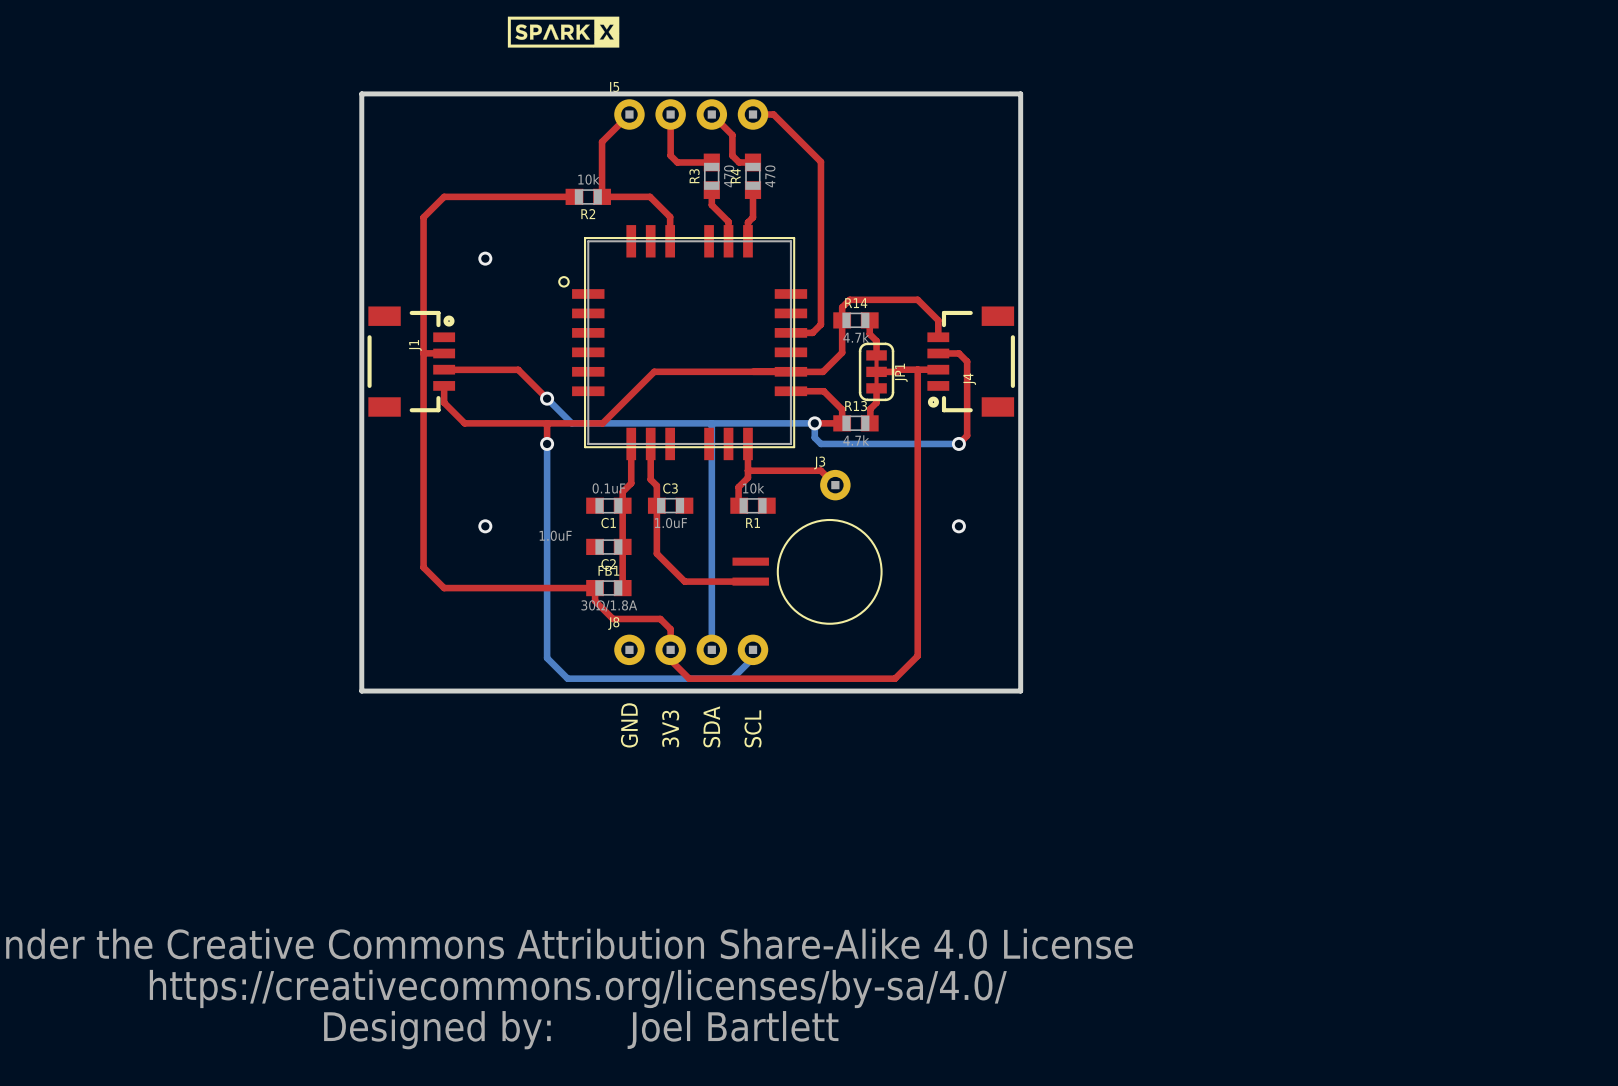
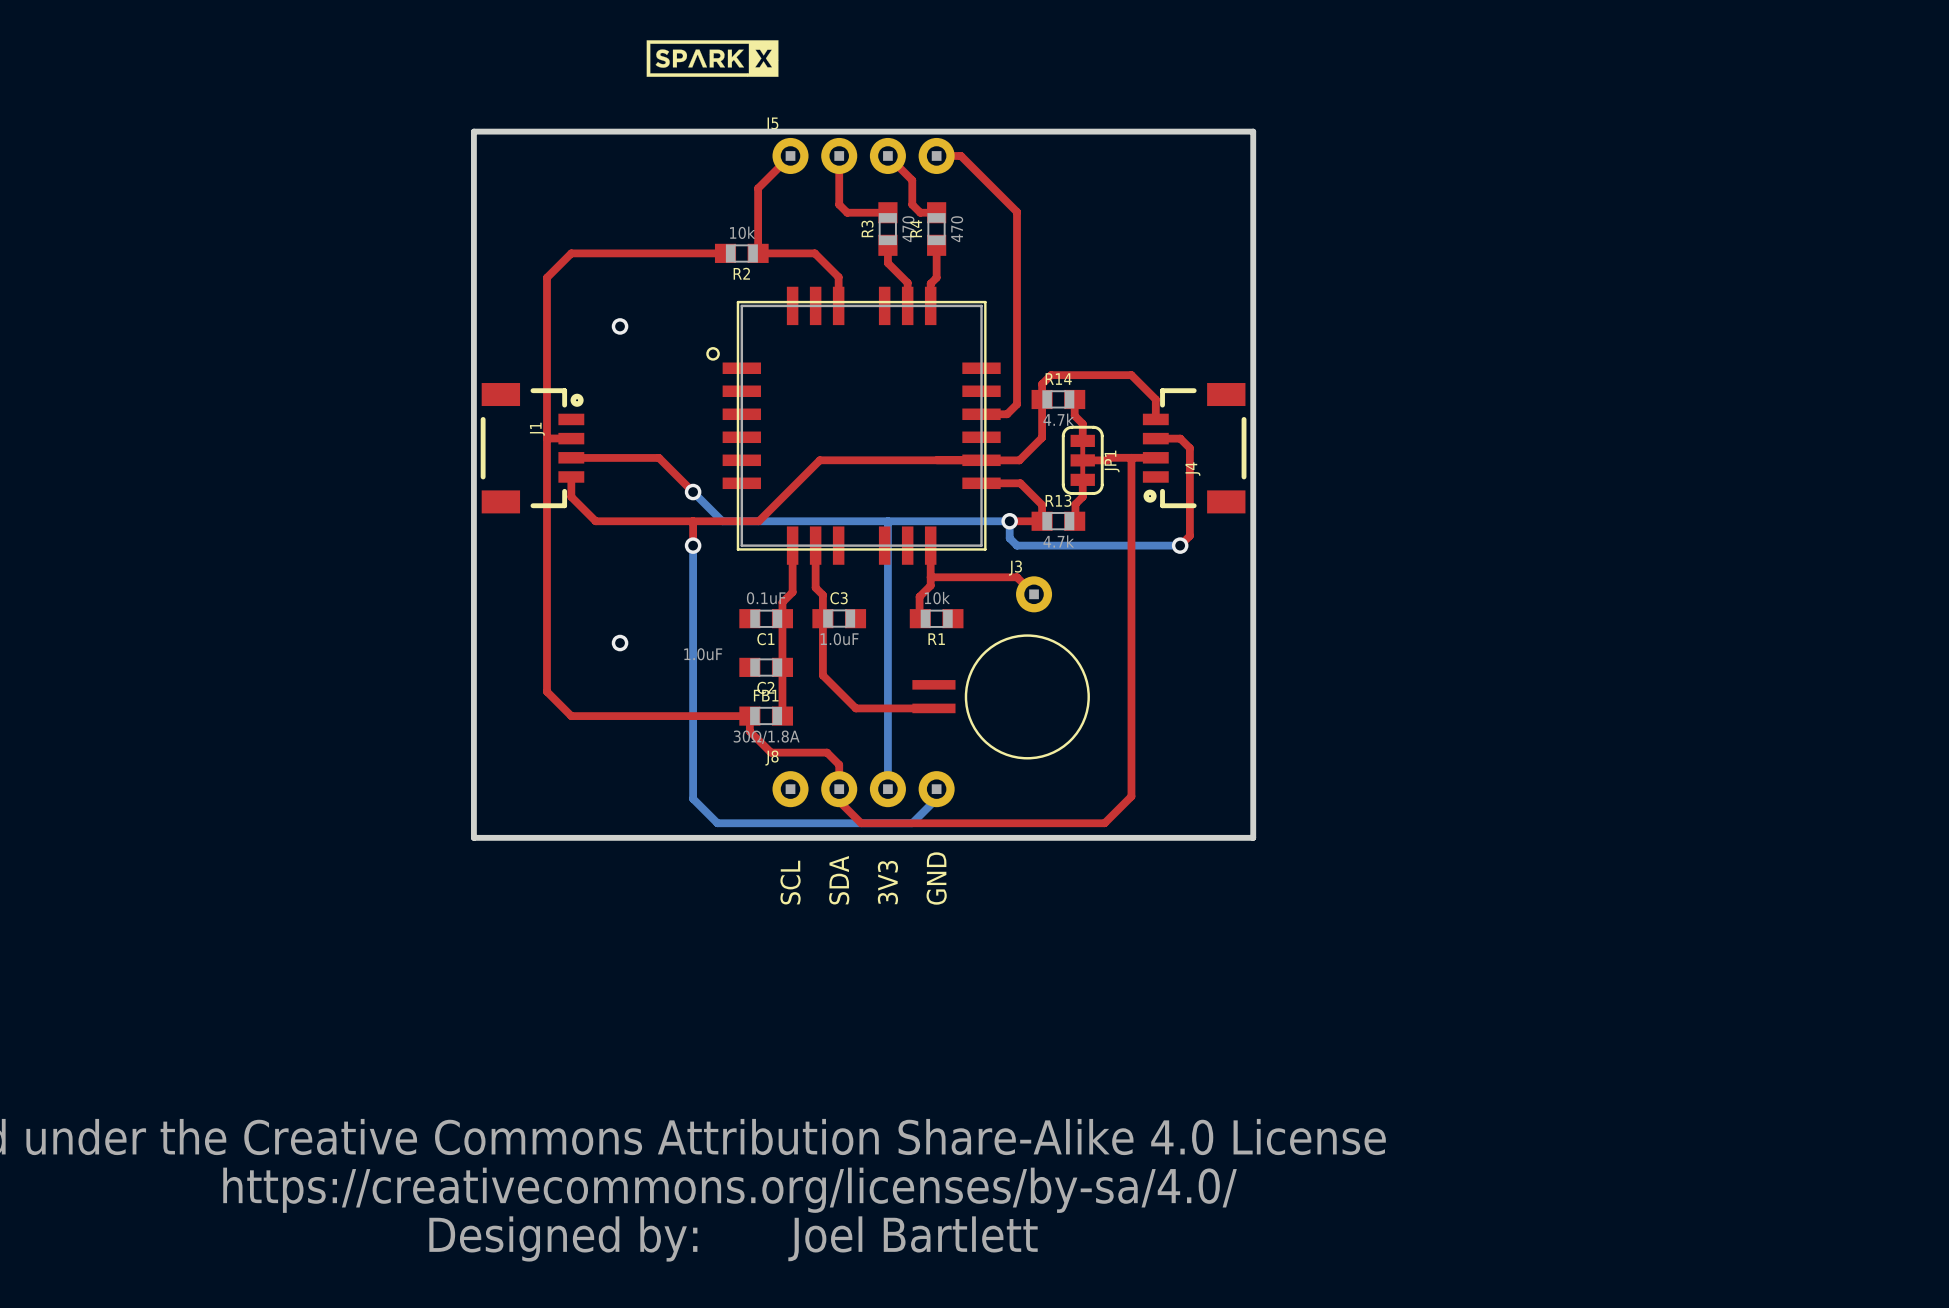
via: (958, 526) -> none
text: GND (629, 725) -> SCL (790, 882)
text: SDA (711, 726) -> 3V3 (887, 882)
text: 3V3 (670, 728) -> SDA (839, 880)
text: SCL (753, 728) -> GND (936, 878)

